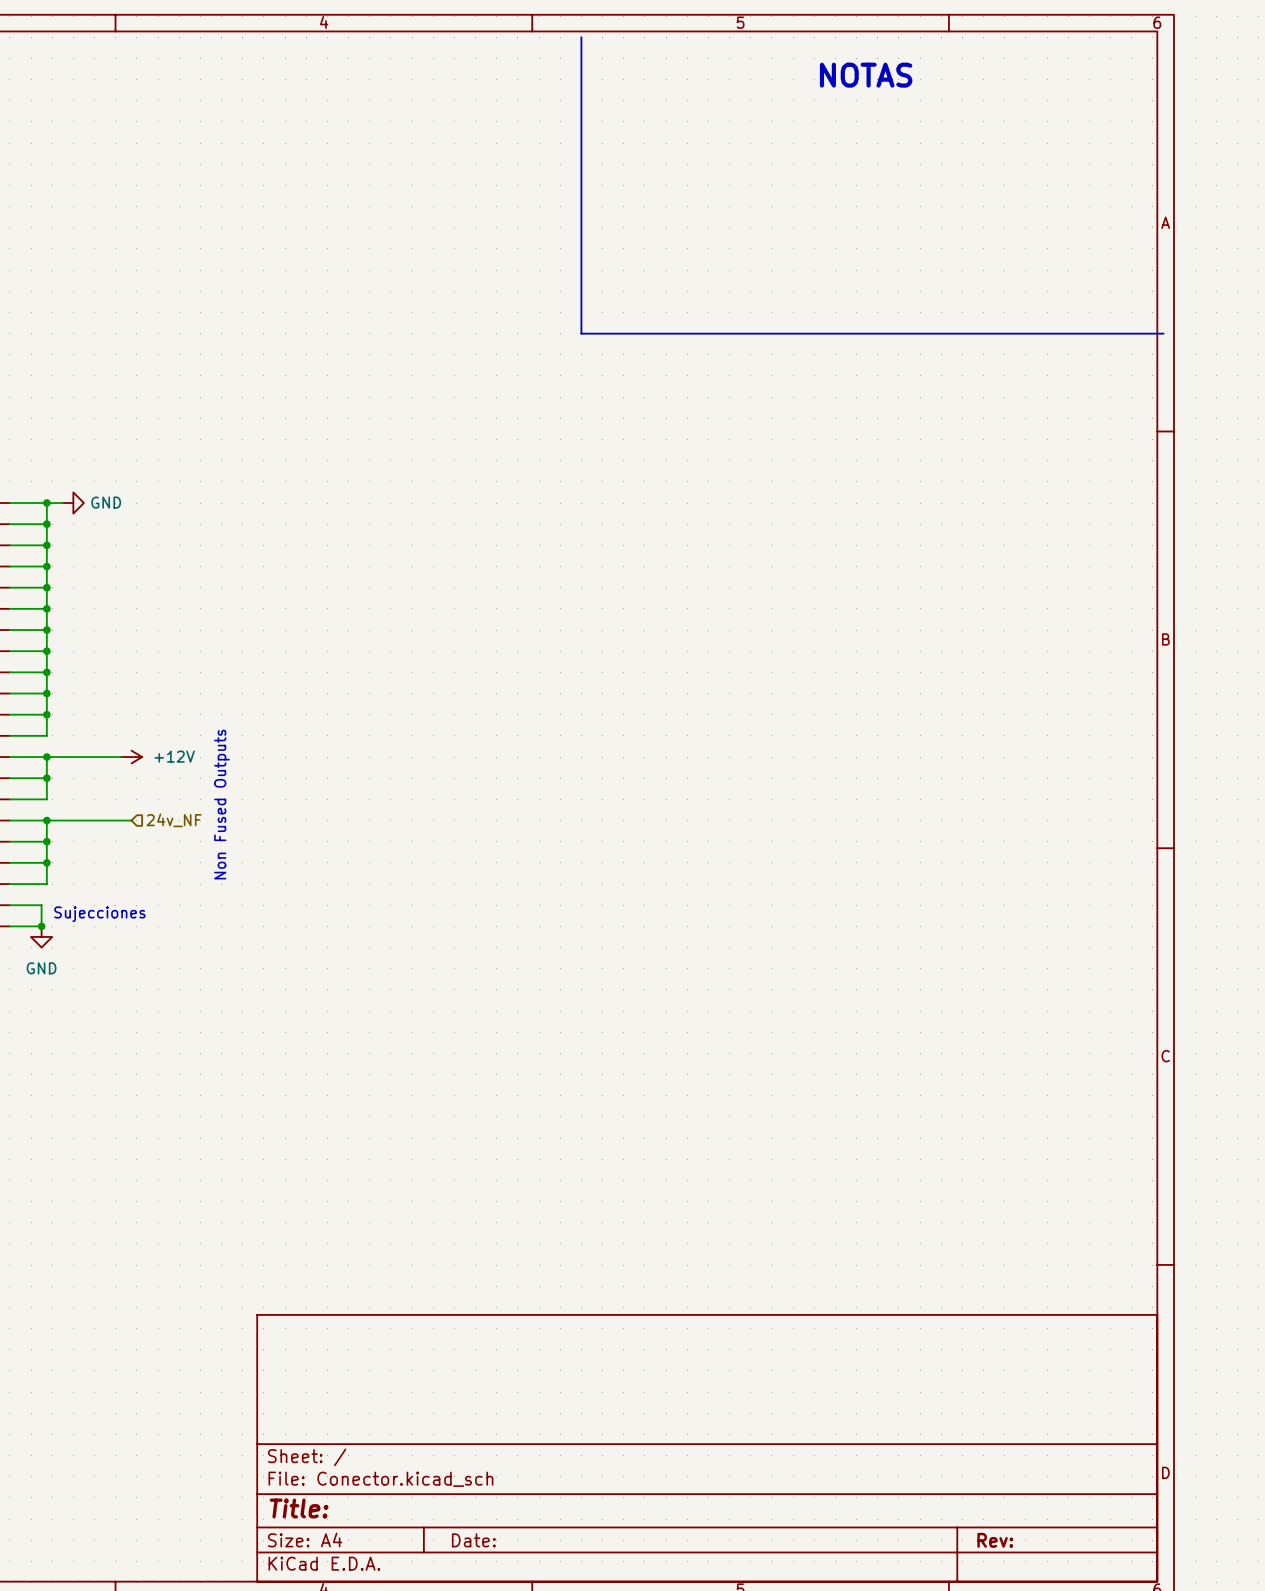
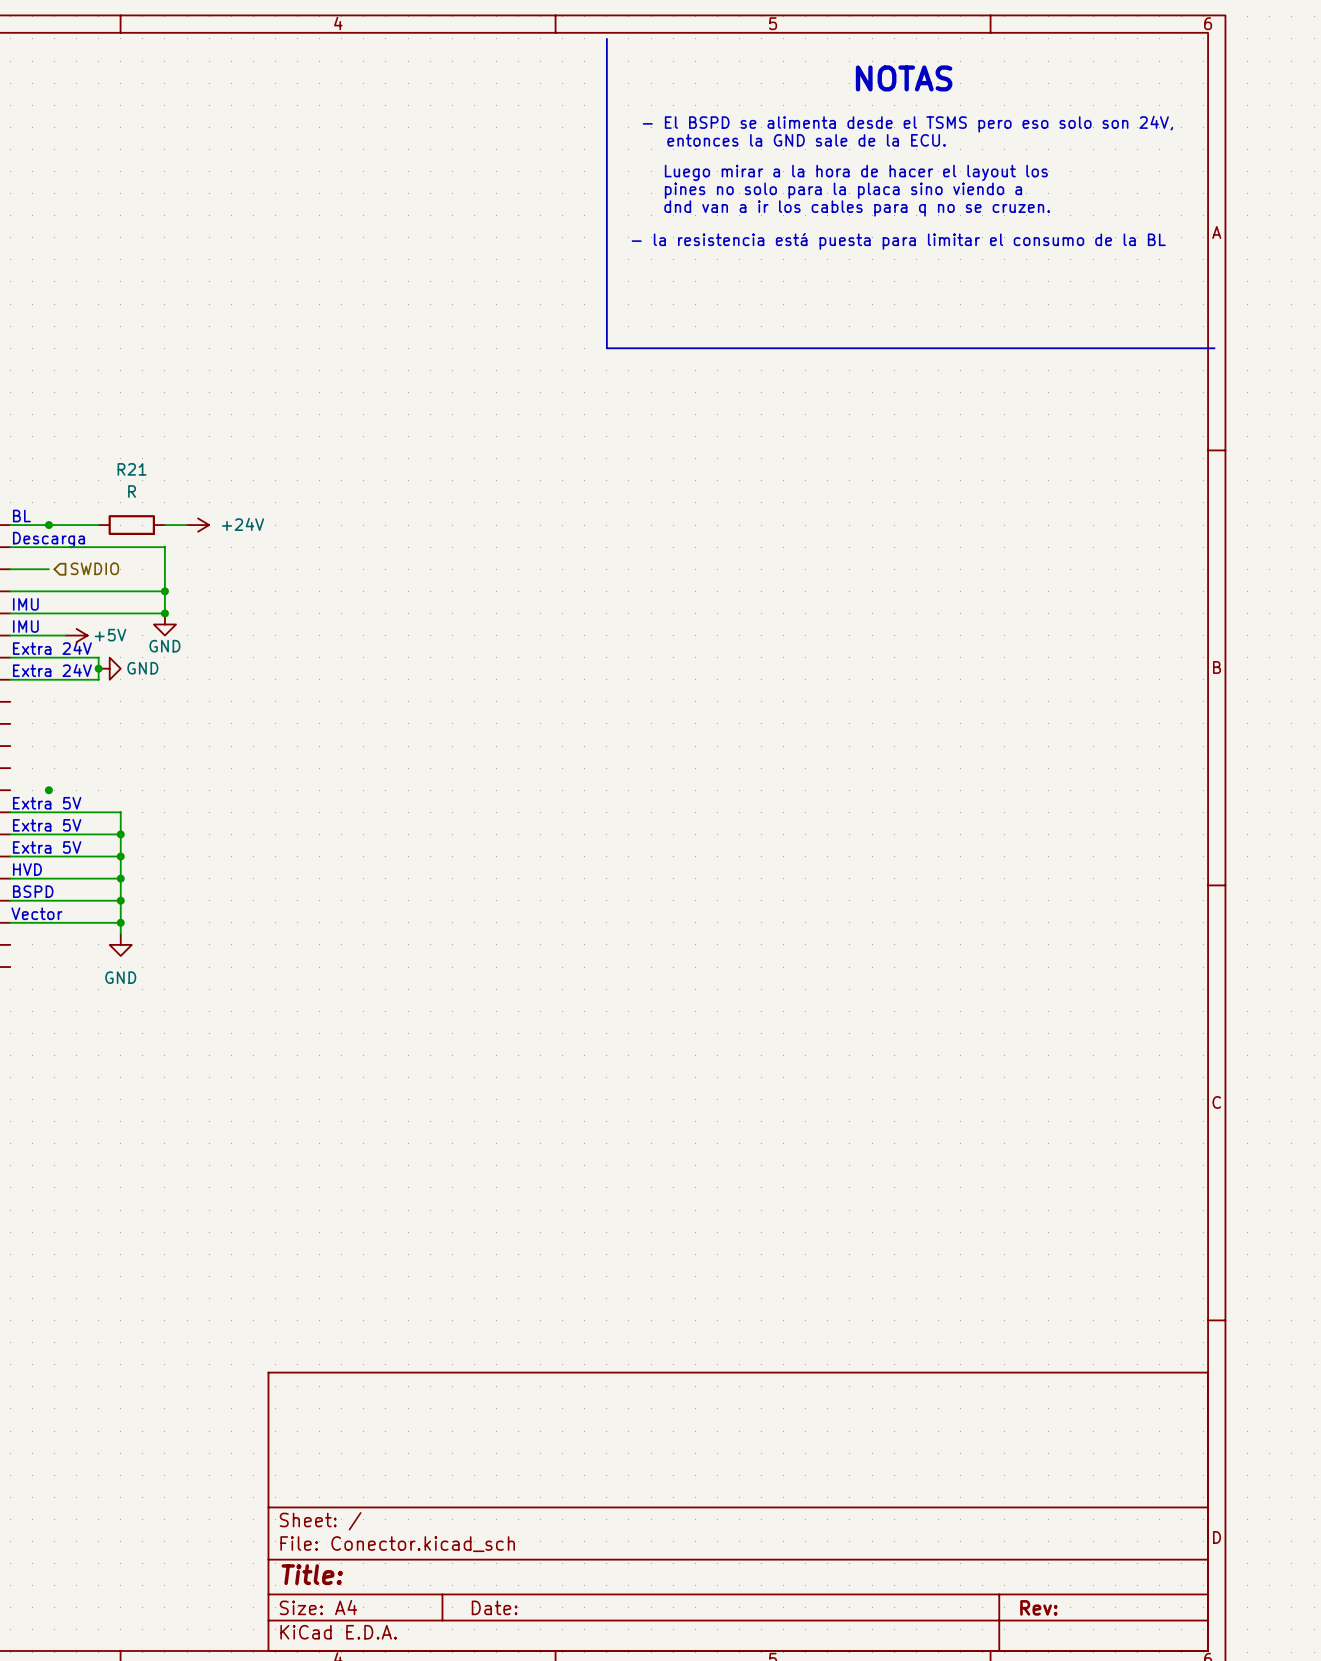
text: none -> - El BSPD se alimenta desde el TSMS pero eso solo son 24V, (907, 124)
text: none -> entonces la GND sale de la ECU. (806, 140)
text: none -> Luego mirar a la hora de hacer el layout los (856, 172)
text: none -> pines no solo para la placa sino viendo a (843, 190)
text: none -> dnd van a ir los cables para q no se cruzen. (857, 208)
text: none -> - la resistencia está puesta para limitar el consumo de la BL (898, 241)
text: none -> BL (21, 516)
wire: (46, 503) (46, 735) (9, 735) -> none
wire: none -> (65, 525) (98, 525)
power symbol: GND (73, 503) -> none
R21: none -> R (131, 525)
wire: none -> (164, 525) (187, 525)
power symbol: none -> +24V (198, 525)
text: none -> Descarga (49, 539)
wire: none -> (48, 547) (164, 547) (164, 613) (48, 613)
junction: (46, 524) -> none
hierarchical label: none -> SWDIO (94, 568)
junction: (46, 545) -> none
junction: (46, 566) -> none
junction: none -> (164, 591)
text: none -> IMU (25, 604)
junction: (46, 587) -> none
junction: none -> (164, 613)
power symbol: none -> GND (164, 624)
text: none -> IMU (25, 626)
wire: none -> (48, 635) (65, 635)
junction: (46, 608) -> none
power symbol: none -> +5V (76, 635)
text: none -> Extra 24V (52, 648)
wire: none -> (48, 657) (98, 657) (98, 679) (48, 679)
junction: (46, 630) -> none
junction: none -> (98, 668)
power symbol: none -> GND (109, 668)
text: none -> Extra 24V (52, 670)
junction: (46, 651) -> none
wire: (9, 672) (46, 672) -> none
junction: (46, 672) -> none
wire: (9, 693) (46, 693) -> none
junction: (46, 693) -> none
wire: (9, 714) (46, 714) -> none
junction: (46, 714) -> none
wire: (9, 757) (120, 757) -> (48, 591) (164, 591)
wire: (46, 757) (46, 799) -> (120, 834) (48, 834)
power symbol: +12V (131, 757) -> none
text: none -> Extra 5V (47, 803)
wire: none -> (48, 812) (120, 812) (120, 933)
junction: (46, 778) -> none
text: none -> Extra 5V (47, 825)
junction: none -> (120, 834)
text: Non Fused Outputs (221, 804) -> none
text: none -> Extra 5V (47, 847)
wire: (46, 820) (46, 884) -> (120, 922) (48, 922)
junction: (46, 820) -> none
wire: (115, 820) (131, 820) -> none
junction: none -> (120, 856)
hierarchical label: 24v_NF (174, 820) -> none
text: none -> HVD (27, 869)
wire: none -> (48, 878) (120, 878)
junction: (46, 841) -> none
junction: none -> (120, 878)
text: none -> BSPD (33, 891)
wire: none -> (48, 900) (120, 900)
junction: (46, 862) -> none
junction: none -> (120, 900)
text: none -> Vector (36, 913)
junction: none -> (120, 922)
wire: (9, 905) (41, 905) (41, 926) (9, 926) -> none
text: Sujecciones (99, 914) -> none
junction: (41, 926) -> none
power symbol position: GND (41, 936) -> GND (120, 944)

